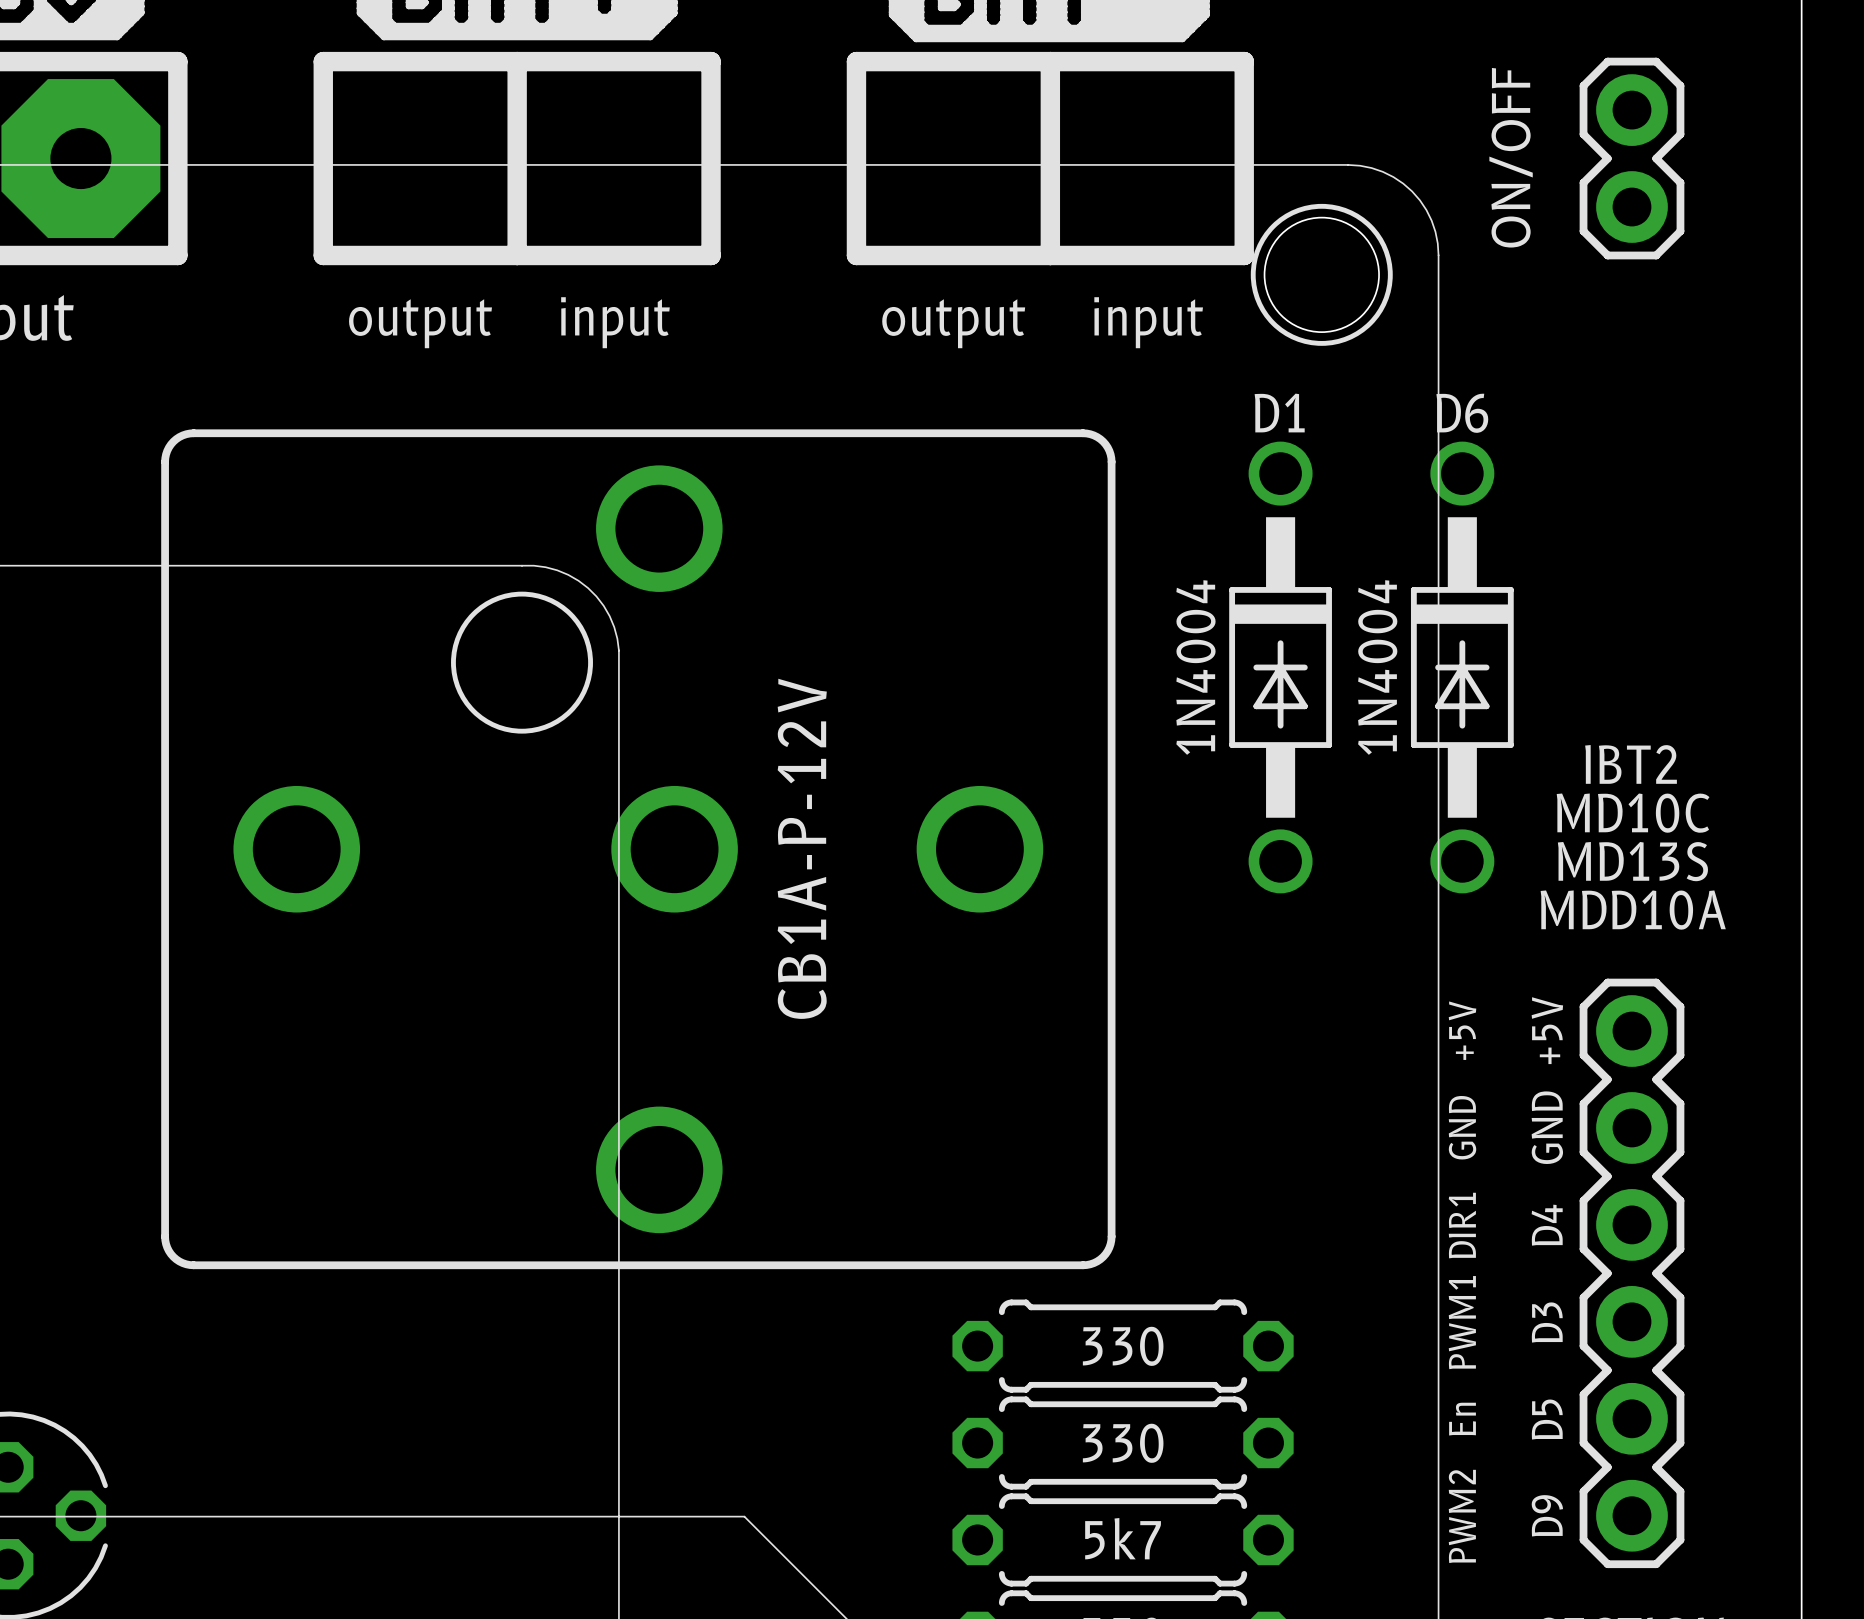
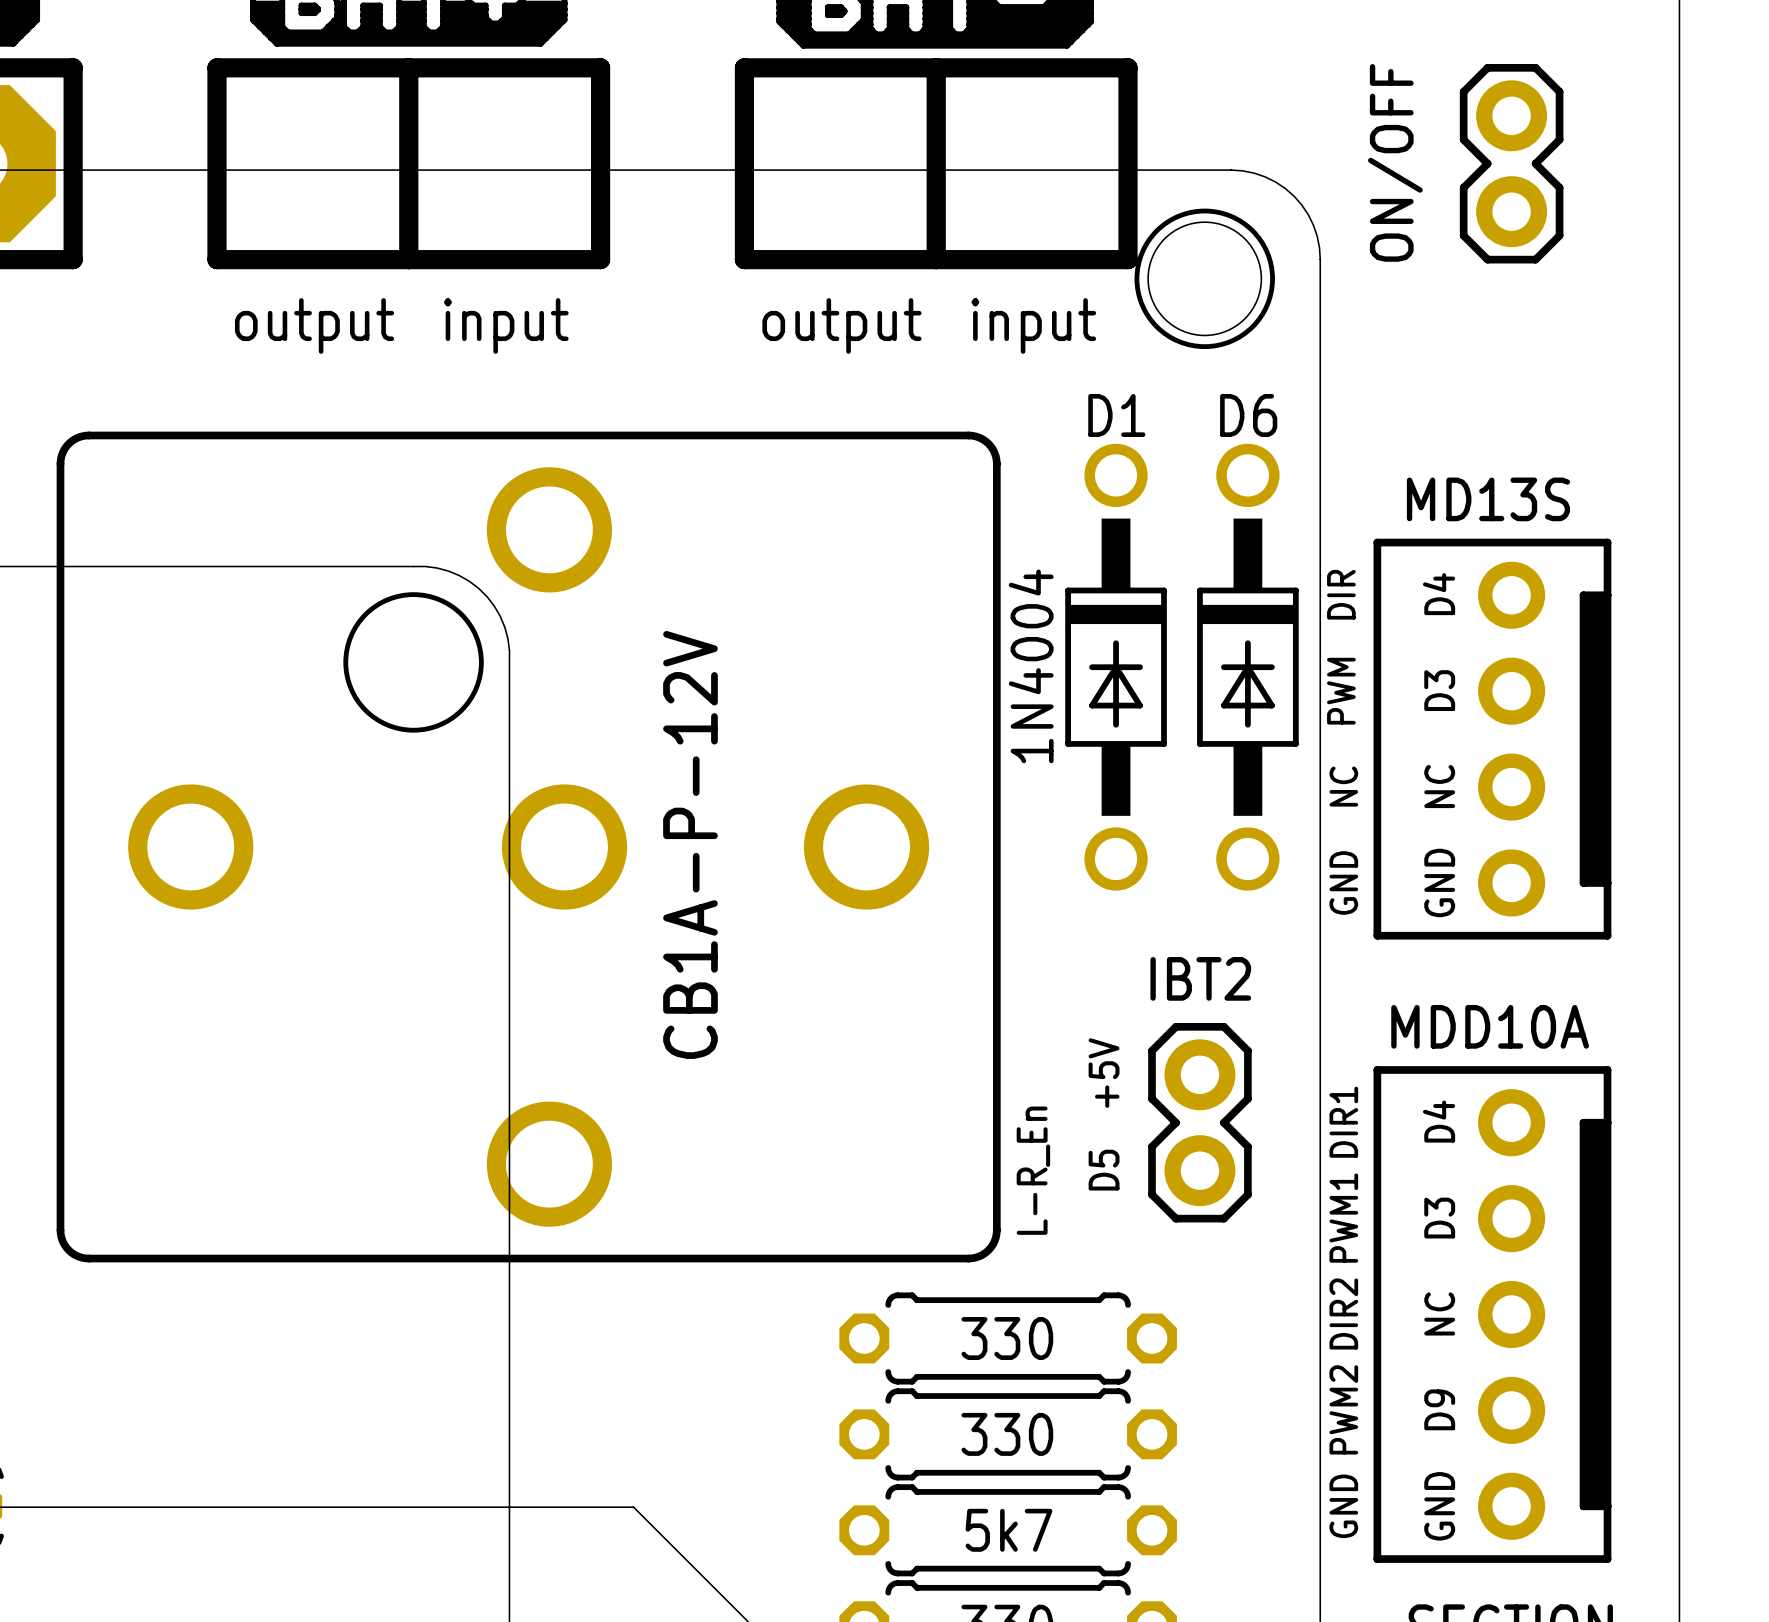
text: none -> DIR (1341, 594)
text: none -> D4 (1439, 594)
D1 position: (1280, 667) -> (1116, 667)
D6 value: 1N4004 (1377, 667) -> none
D6 position: (1462, 667) -> (1247, 667)
text: none -> PWM (1341, 691)
text: none -> D3 (1439, 690)
part: none -> (1492, 739)
text position: IBT2 (1631, 764) -> IBT2 (1200, 978)
text: none -> NC (1343, 786)
text: none -> NC (1439, 786)
text: MD10C (1633, 813) -> none
text position: MD13S (1632, 861) -> MD13S (1488, 499)
text: none -> GND (1343, 882)
text: none -> GND (1439, 882)
text position: MDD10A (1633, 910) -> MDD10A (1490, 1026)
text: +5V (1462, 1030) -> none
text: +5V (1547, 1030) -> none
text: none -> +5V (1104, 1073)
D5: none -> (1199, 1122)
text: GND (1462, 1127) -> DIR1 (1343, 1122)
text: GND (1547, 1127) -> none
text: none -> L-R_En (1033, 1170)
text: DIR1 (1462, 1225) -> PWM1 (1343, 1218)
text position: D4 (1547, 1225) -> D4 (1439, 1121)
part: (1631, 1273) -> none
text: none -> NC (1439, 1313)
part: none -> (1492, 1314)
text: PWM1 (1462, 1322) -> DIR2 (1343, 1313)
text position: D3 (1547, 1322) -> D3 (1439, 1218)
text: En (1462, 1419) -> PWM2 (1343, 1409)
text: D5 (1547, 1419) -> none
text position: D9 (1547, 1515) -> D9 (1439, 1409)
text: none -> GND (1439, 1506)
text: PWM2 (1462, 1516) -> GND (1343, 1506)

